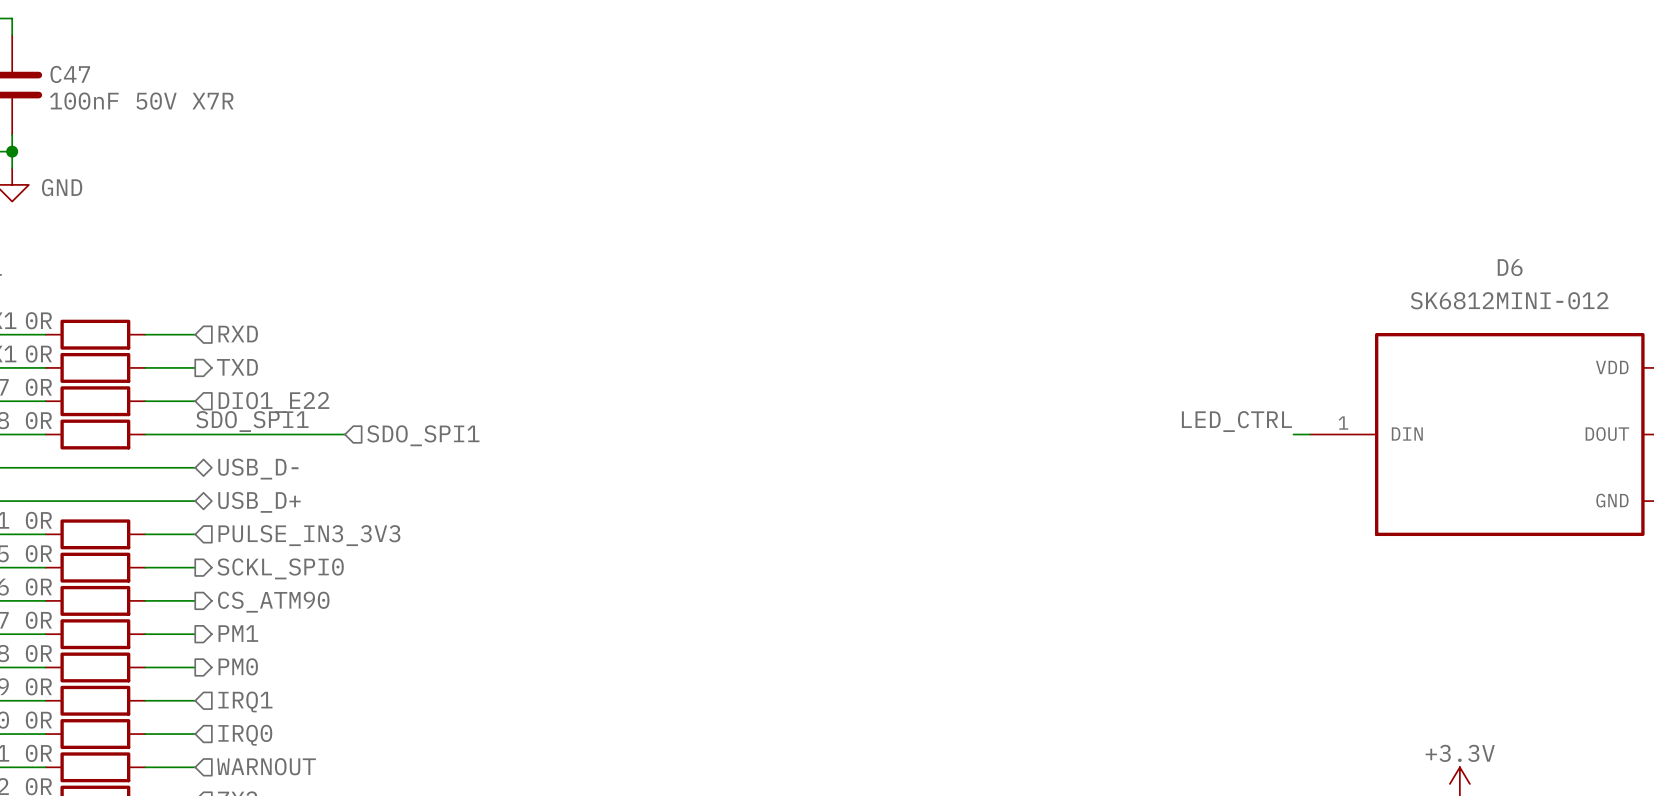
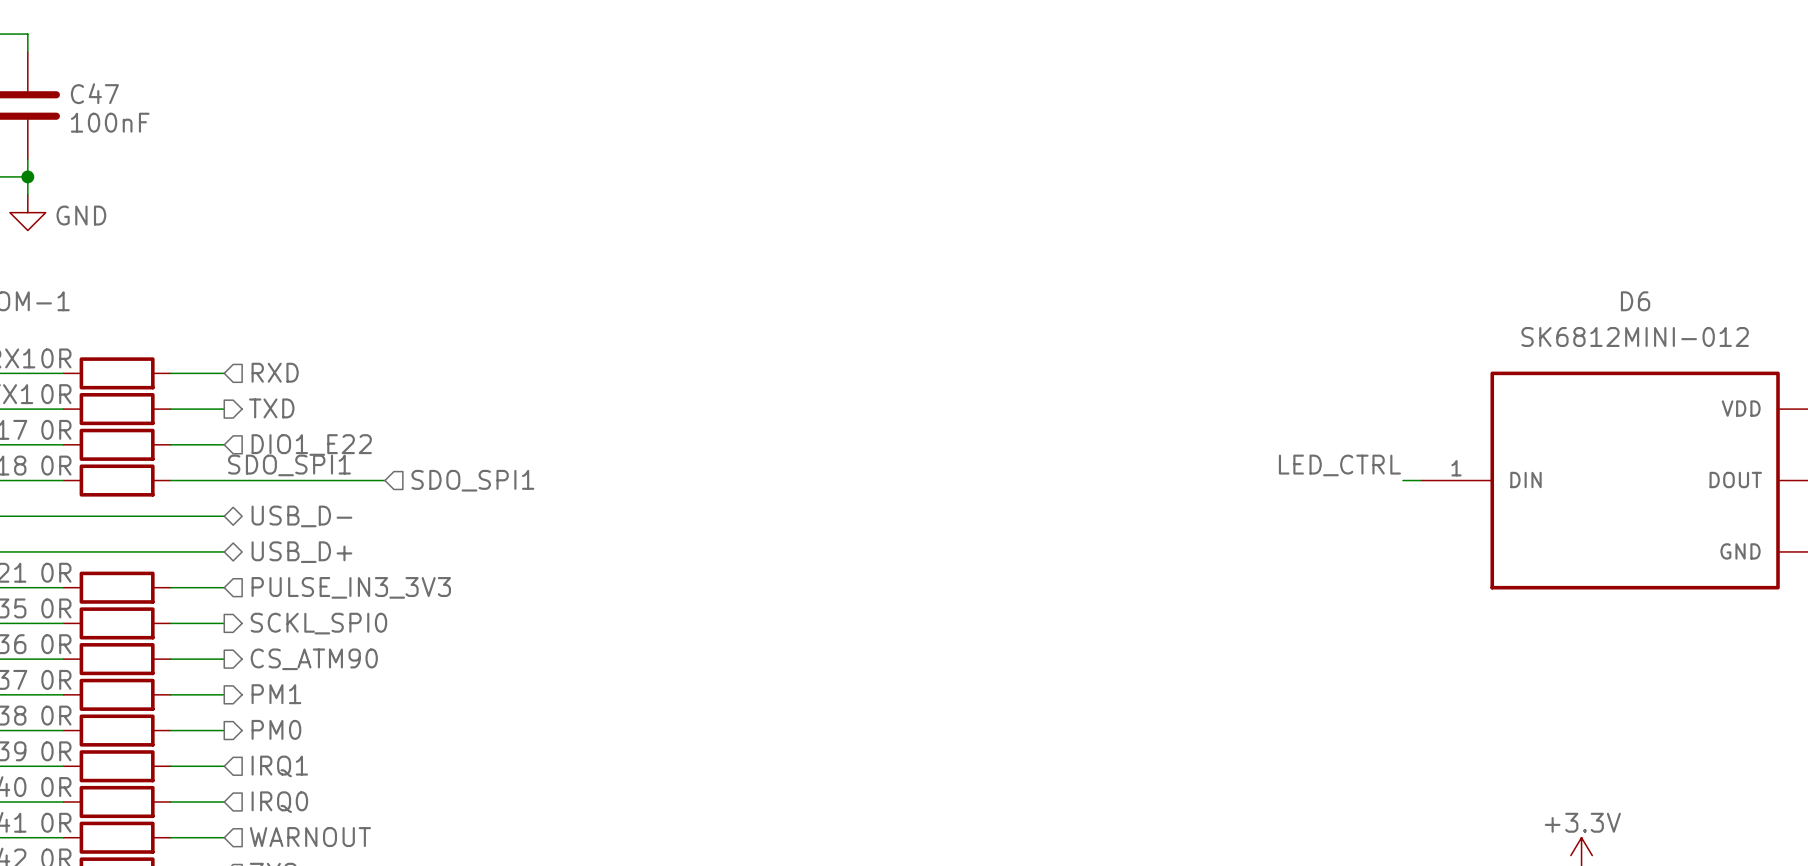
C47 value: 100nF 50V X7R (141, 101) -> 100nF (110, 122)

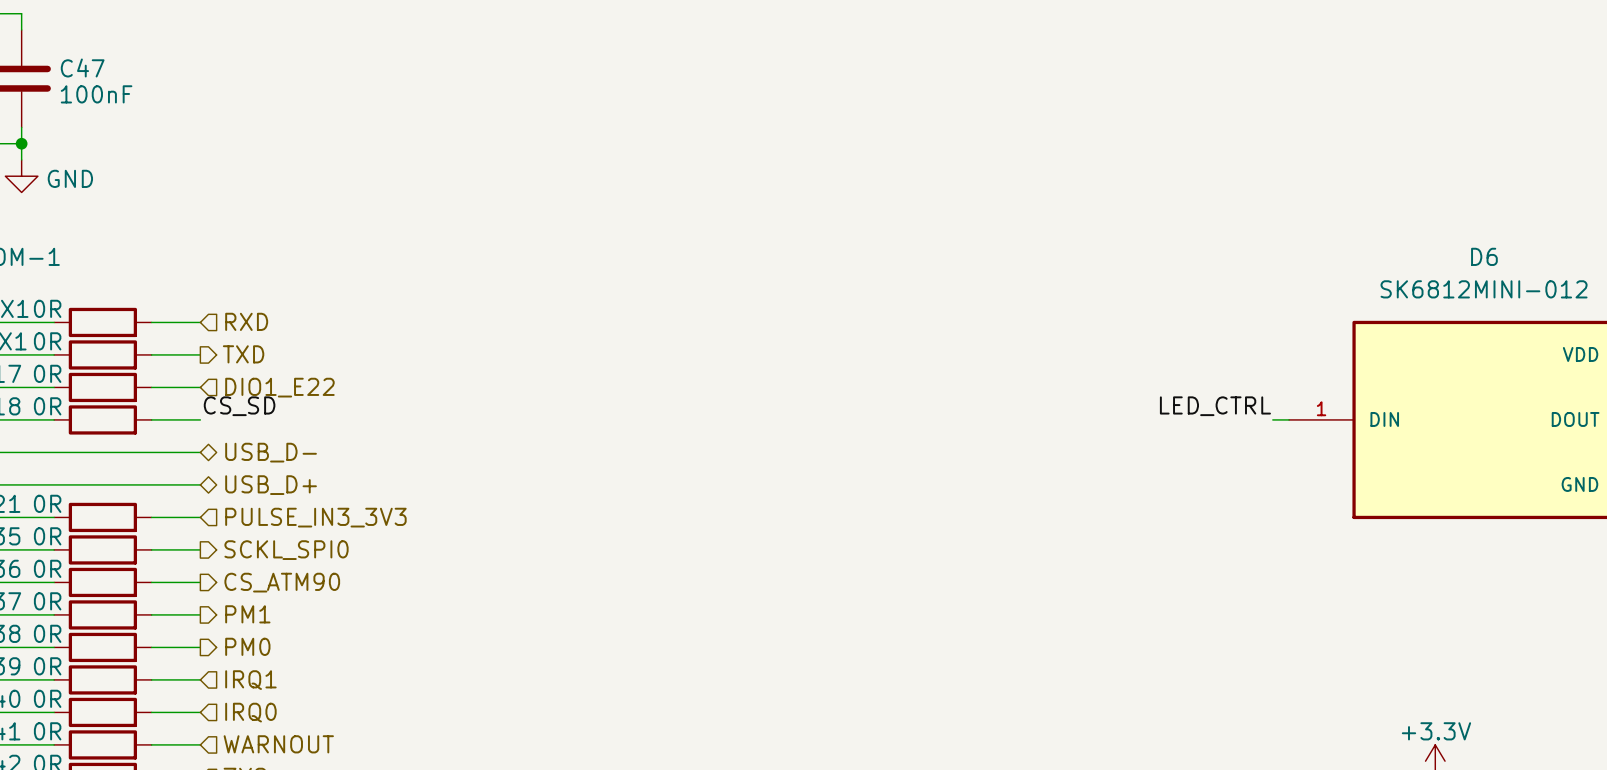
label: SDO_SPI1 (289, 465) -> CS_SD (239, 406)
wire: (224, 480) (385, 480) -> none
hierarchical label: SDO_SPI1 (472, 480) -> none

